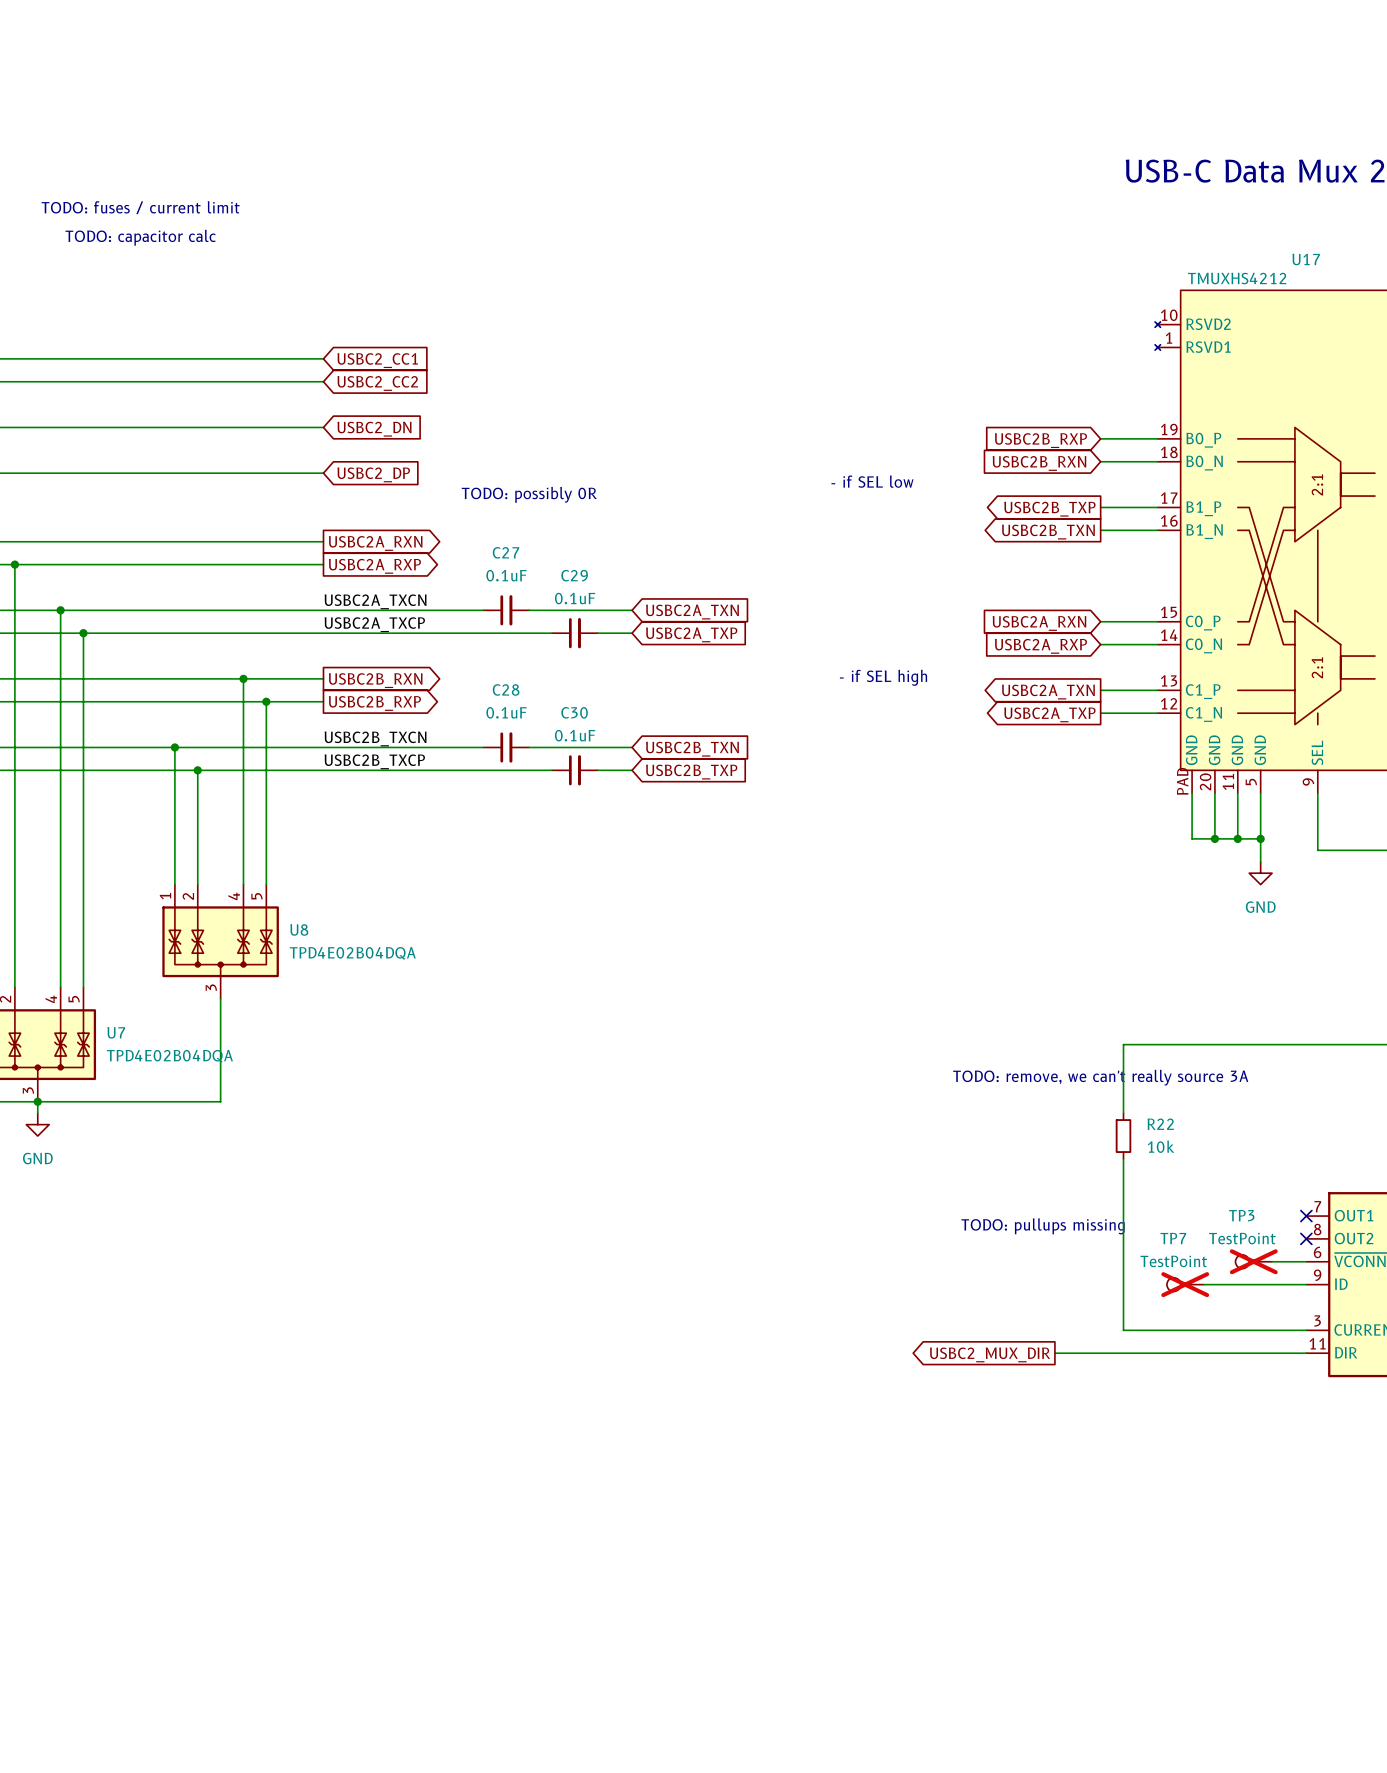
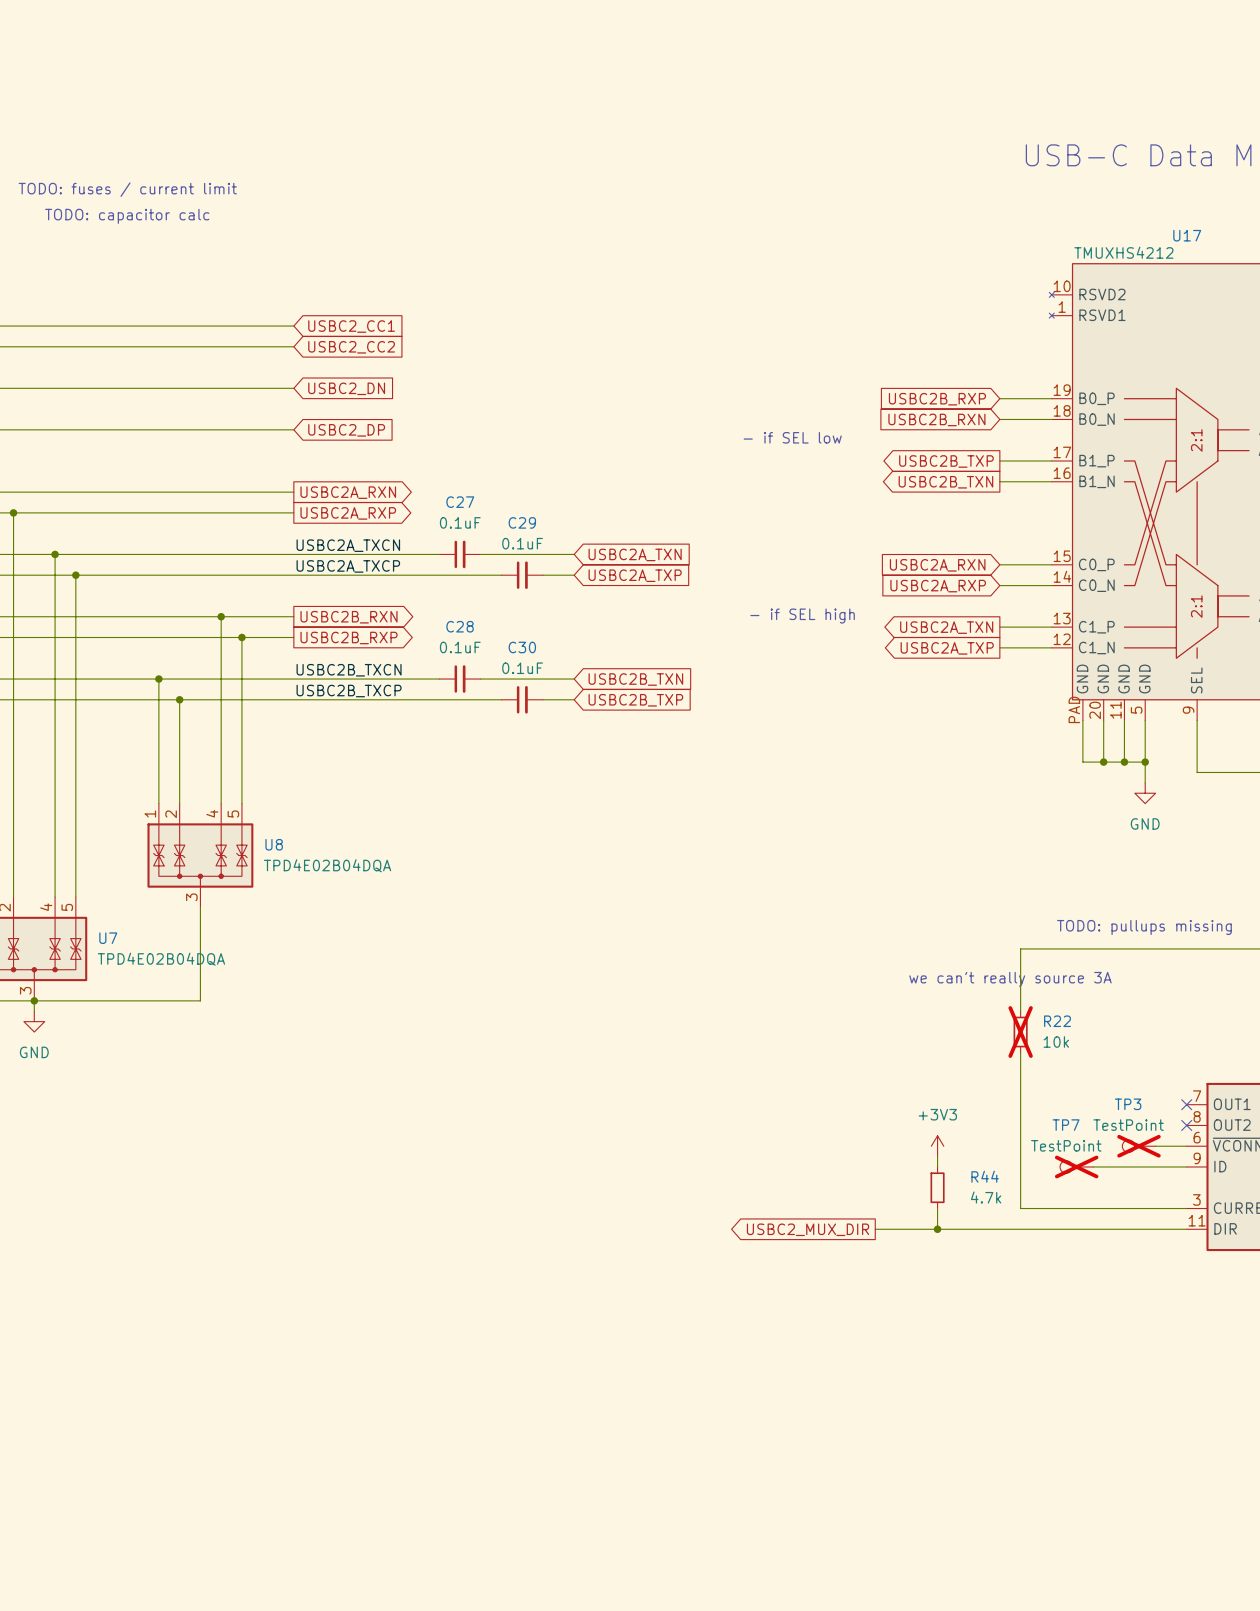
text: TODO: possibly 0R (529, 494) -> none
text: none -> TODO: pullups missing (1144, 927)
text: TODO: remove, we can't really source 3A (1100, 1077) -> we can't really source 3A (1010, 979)
R22 do-not-place cross: none -> (1020, 1032)
text: TODO: pullups missing (1043, 1226) -> none
power symbol: none -> +3V3 (937, 1146)
wire: none -> (937, 1156) (937, 1166)
R44: none -> 4.7k (937, 1187)
wire: none -> (937, 1208) (937, 1229)
wire: none -> (875, 1229) (958, 1229)
junction: none -> (937, 1229)
global label position: USBC2_MUX_DIR (990, 1354) -> USBC2_MUX_DIR (808, 1229)

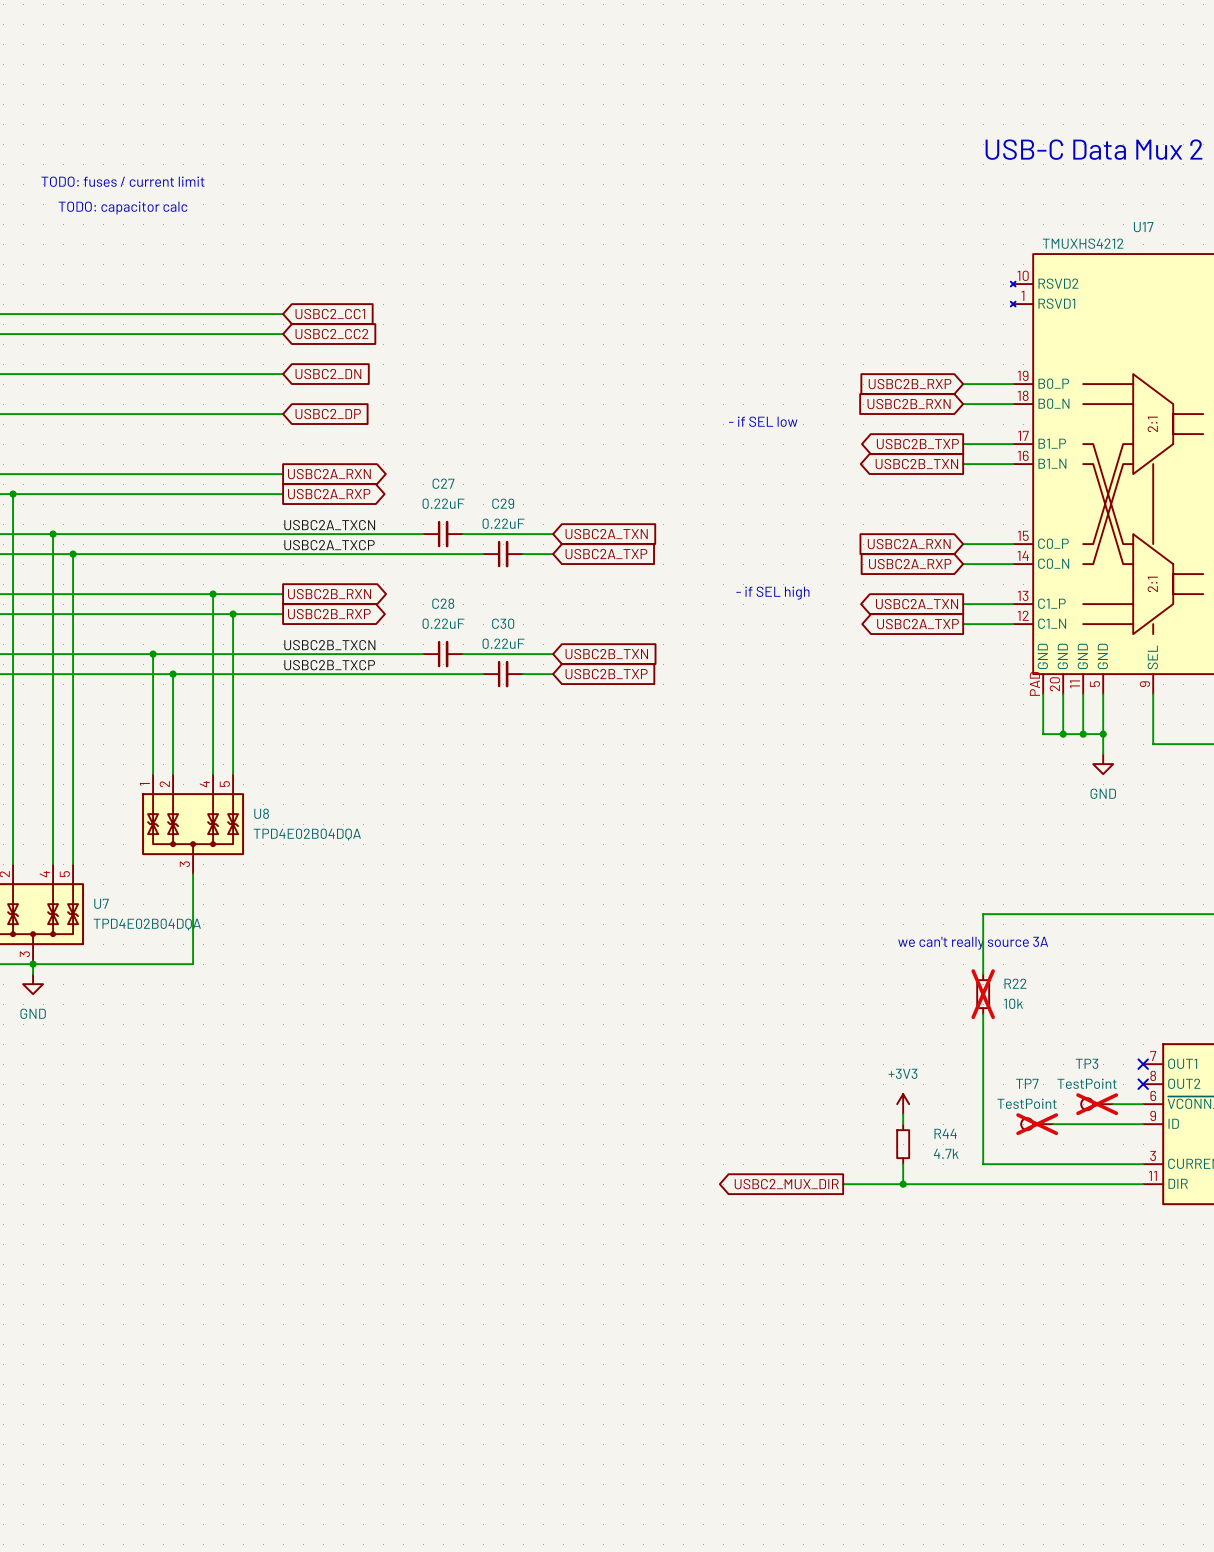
C27 value: 0.1uF (460, 522) -> 0.22uF (443, 503)
C29 value: 0.1uF (522, 543) -> 0.22uF (503, 523)
C28 value: 0.1uF (460, 647) -> 0.22uF (443, 623)
C30 value: 0.1uF (522, 668) -> 0.22uF (503, 643)
text: TODO: pullups missing (1144, 927) -> none

